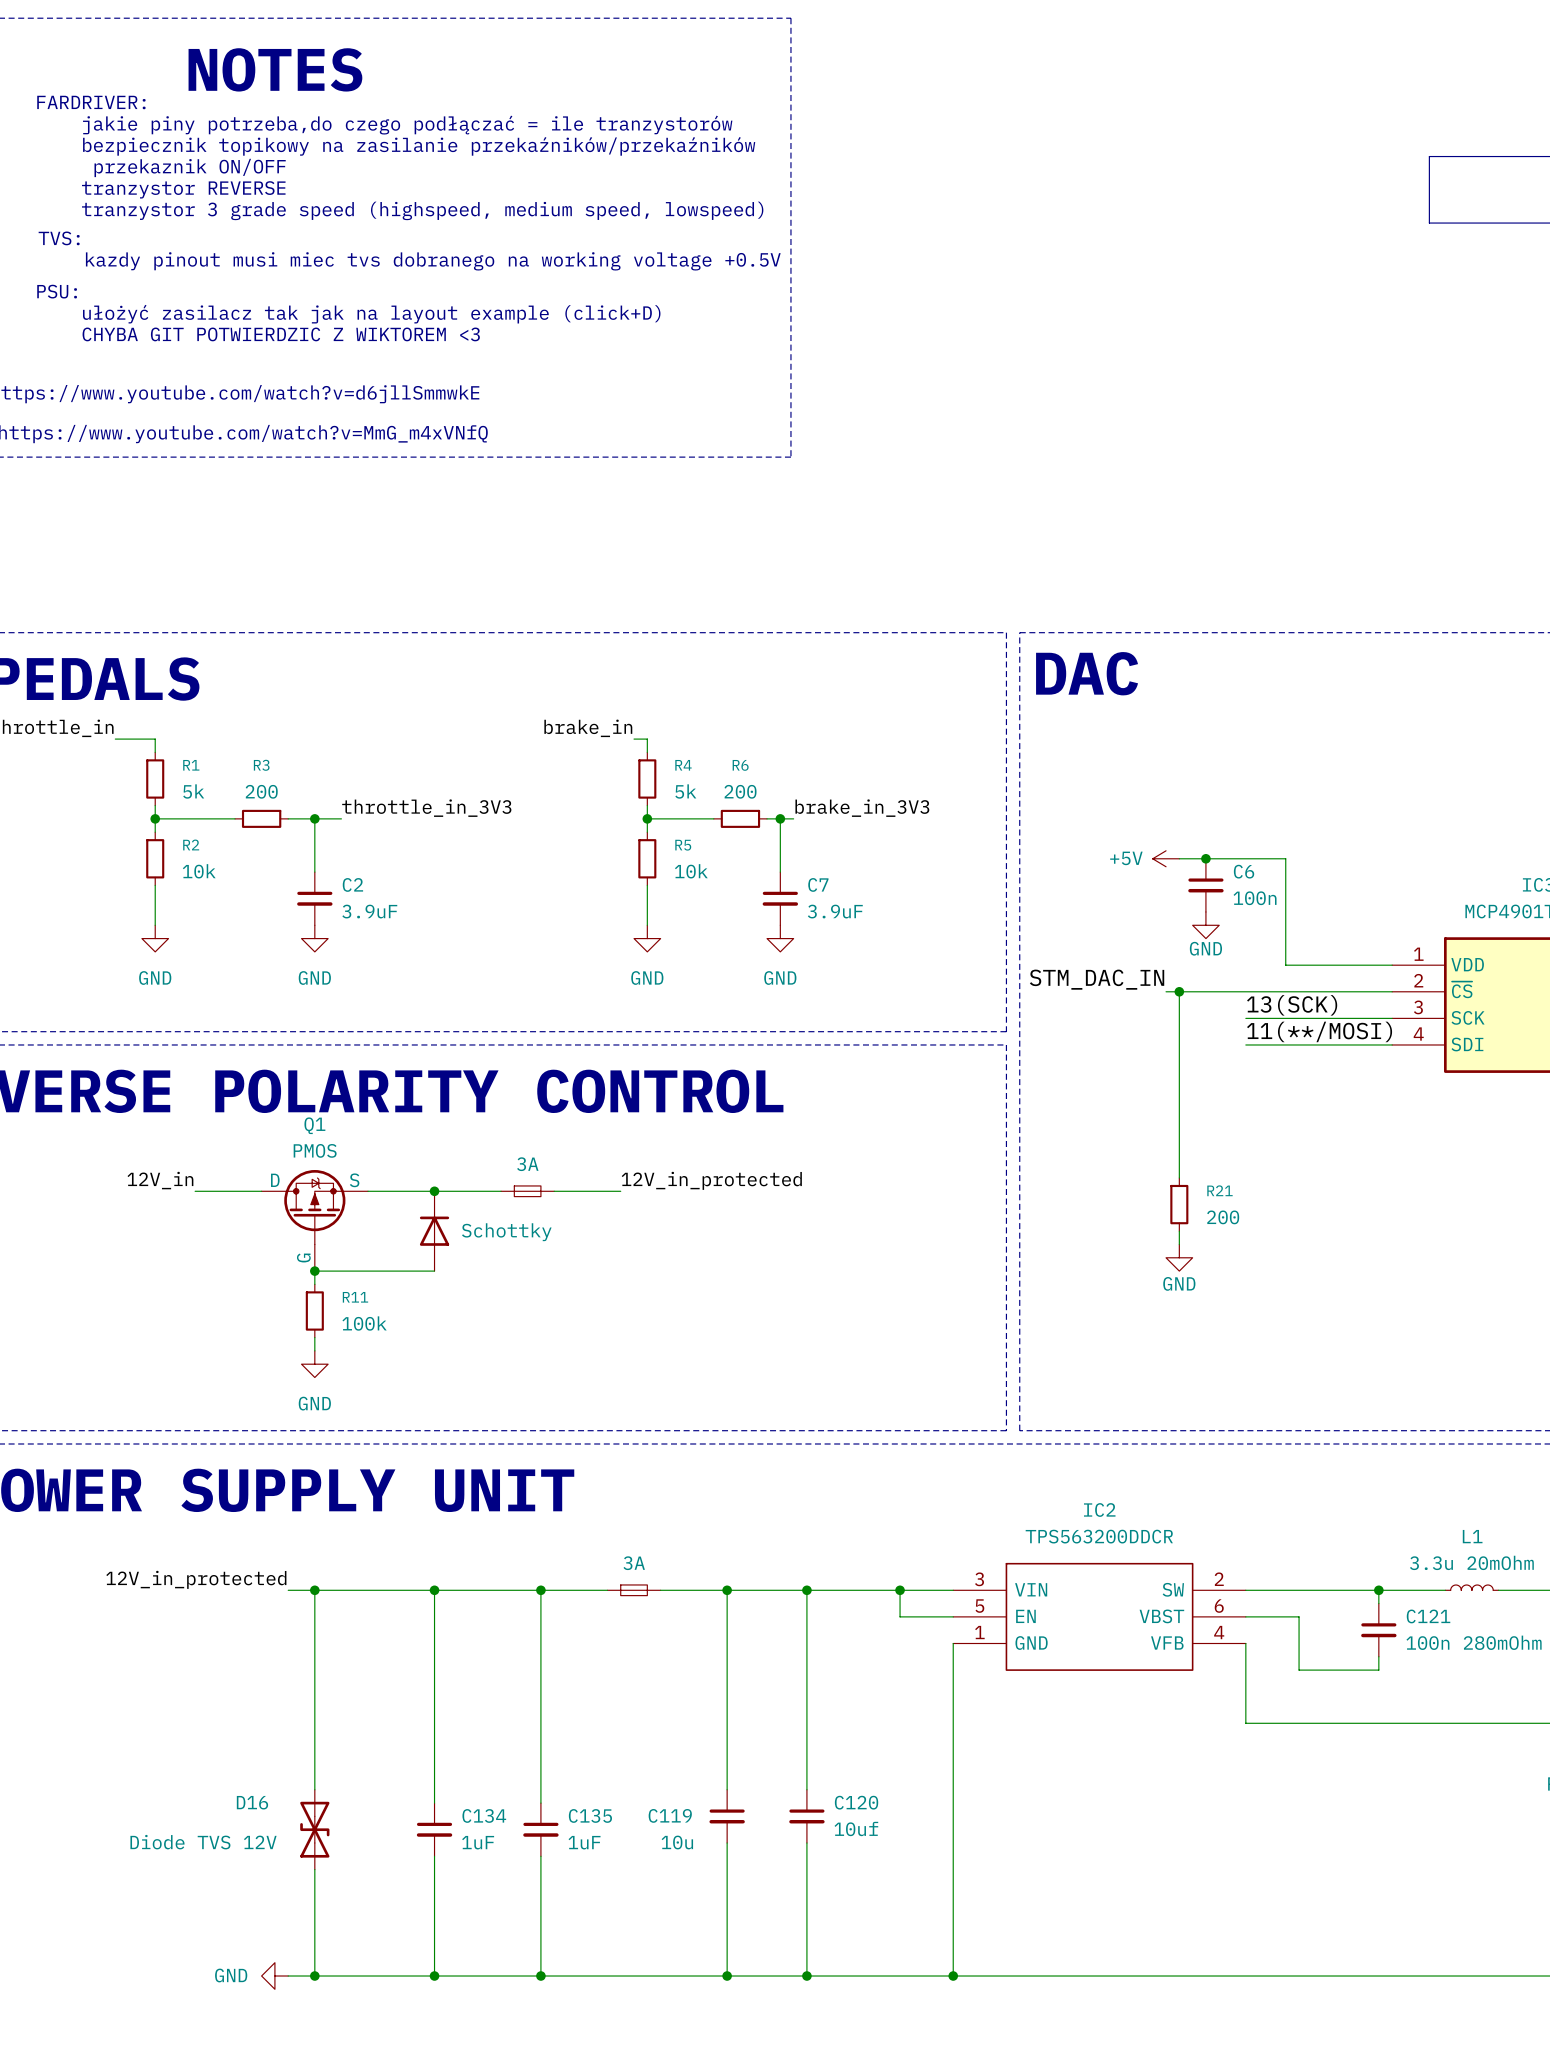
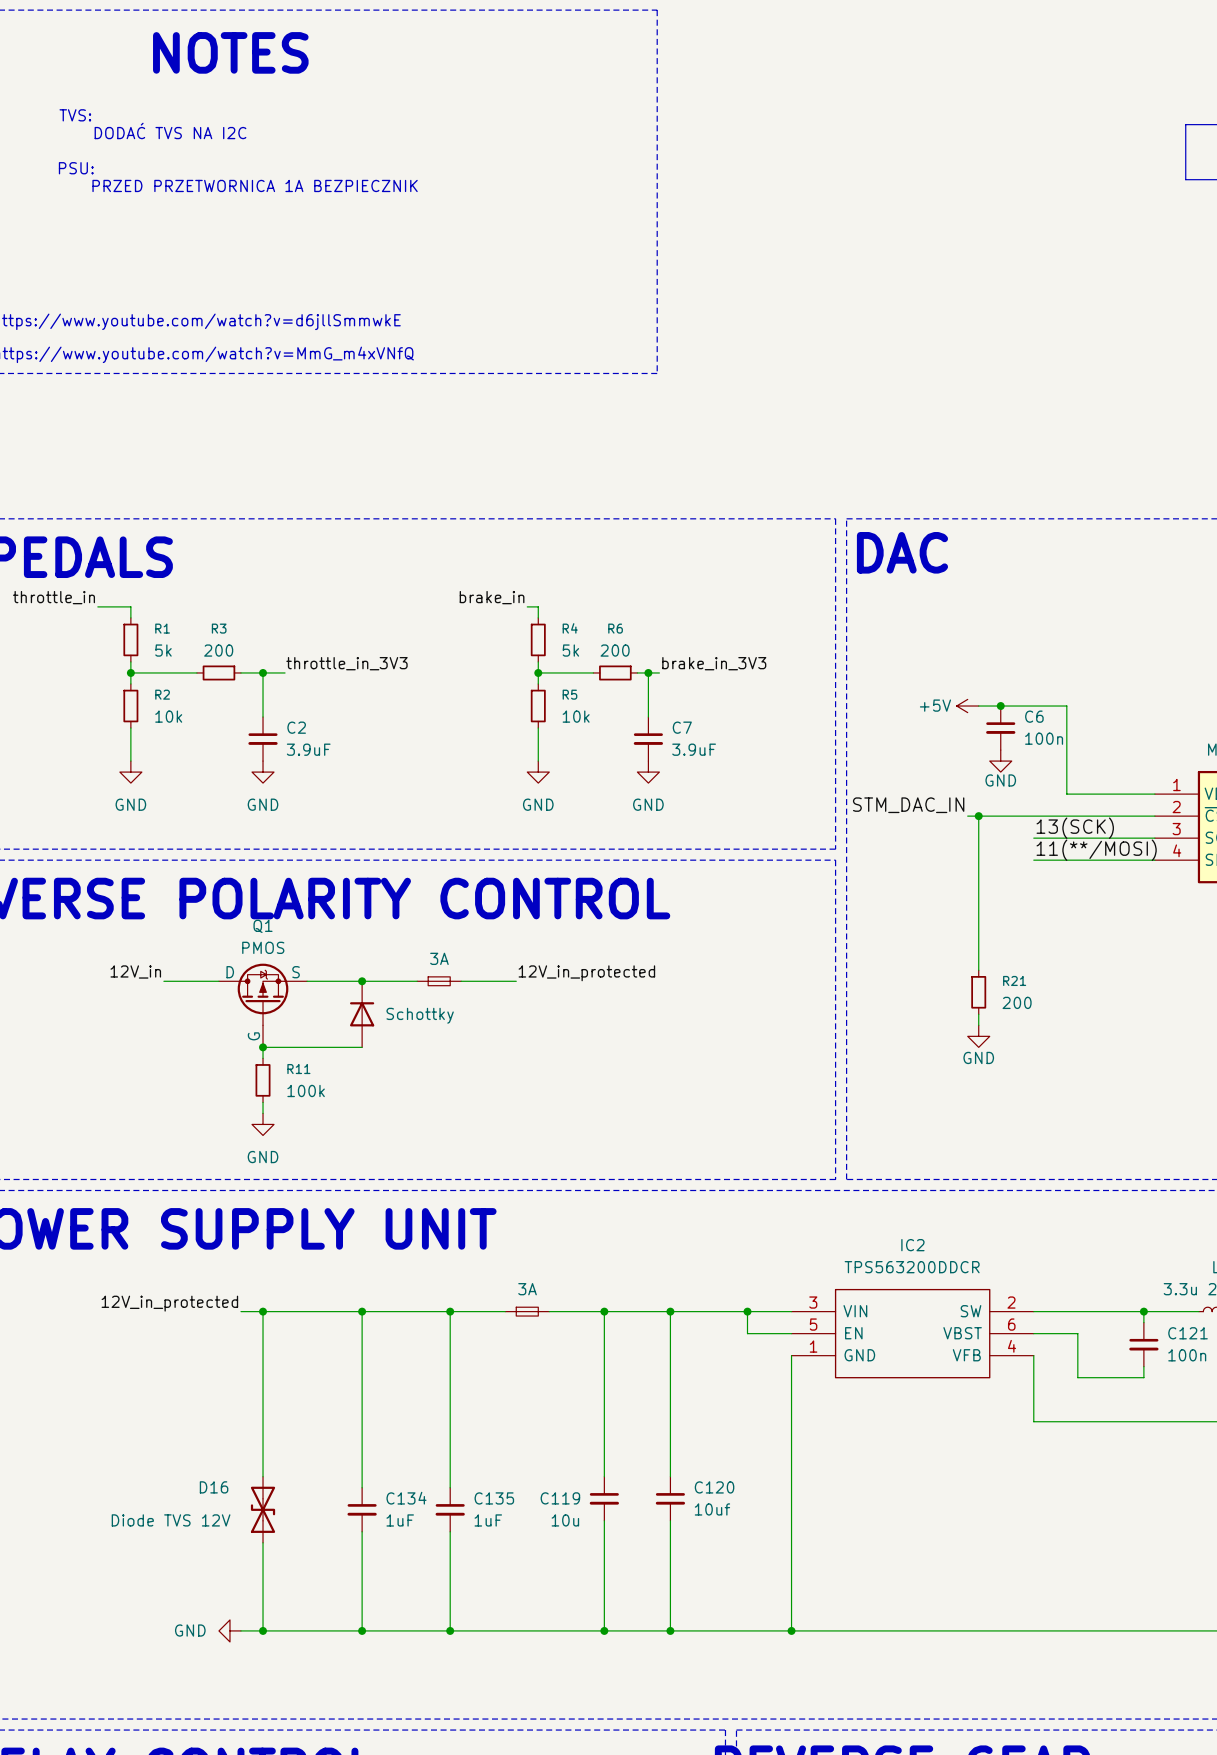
text: FARDRIVER: (91, 102) -> none
text: jakie piny potrzeba,do czego podłączać = ile tranzystorów (407, 125) -> none
text: bezpiecznik topikowy na zasilanie przekaźników/przekaźników (419, 146) -> none
text: none -> DODAĆ TVS NA I2C (170, 130)
text: przekaznik ON/OFF (190, 167) -> none
text: tranzystor REVERSE (183, 189) -> none
text: tranzystor 3 grade speed (highspeed, medium speed, lowspeed) (422, 210) -> none
text: none -> PRZED PRZETWORNICA 1A BEZPIECZNIK (255, 185)
text position: TVS: (59, 238) -> TVS: (75, 115)
text: kazdy pinout musi miec tvs dobranego na working voltage +0.5V (433, 261) -> none
text position: PSU: (57, 291) -> PSU: (76, 168)
text: ułożyć zasilacz tak jak na layout example (click+D) (371, 314) -> none
text: CHYBA GIT POTWIERDZIC Z WIKTOREM <3 (281, 334) -> none

